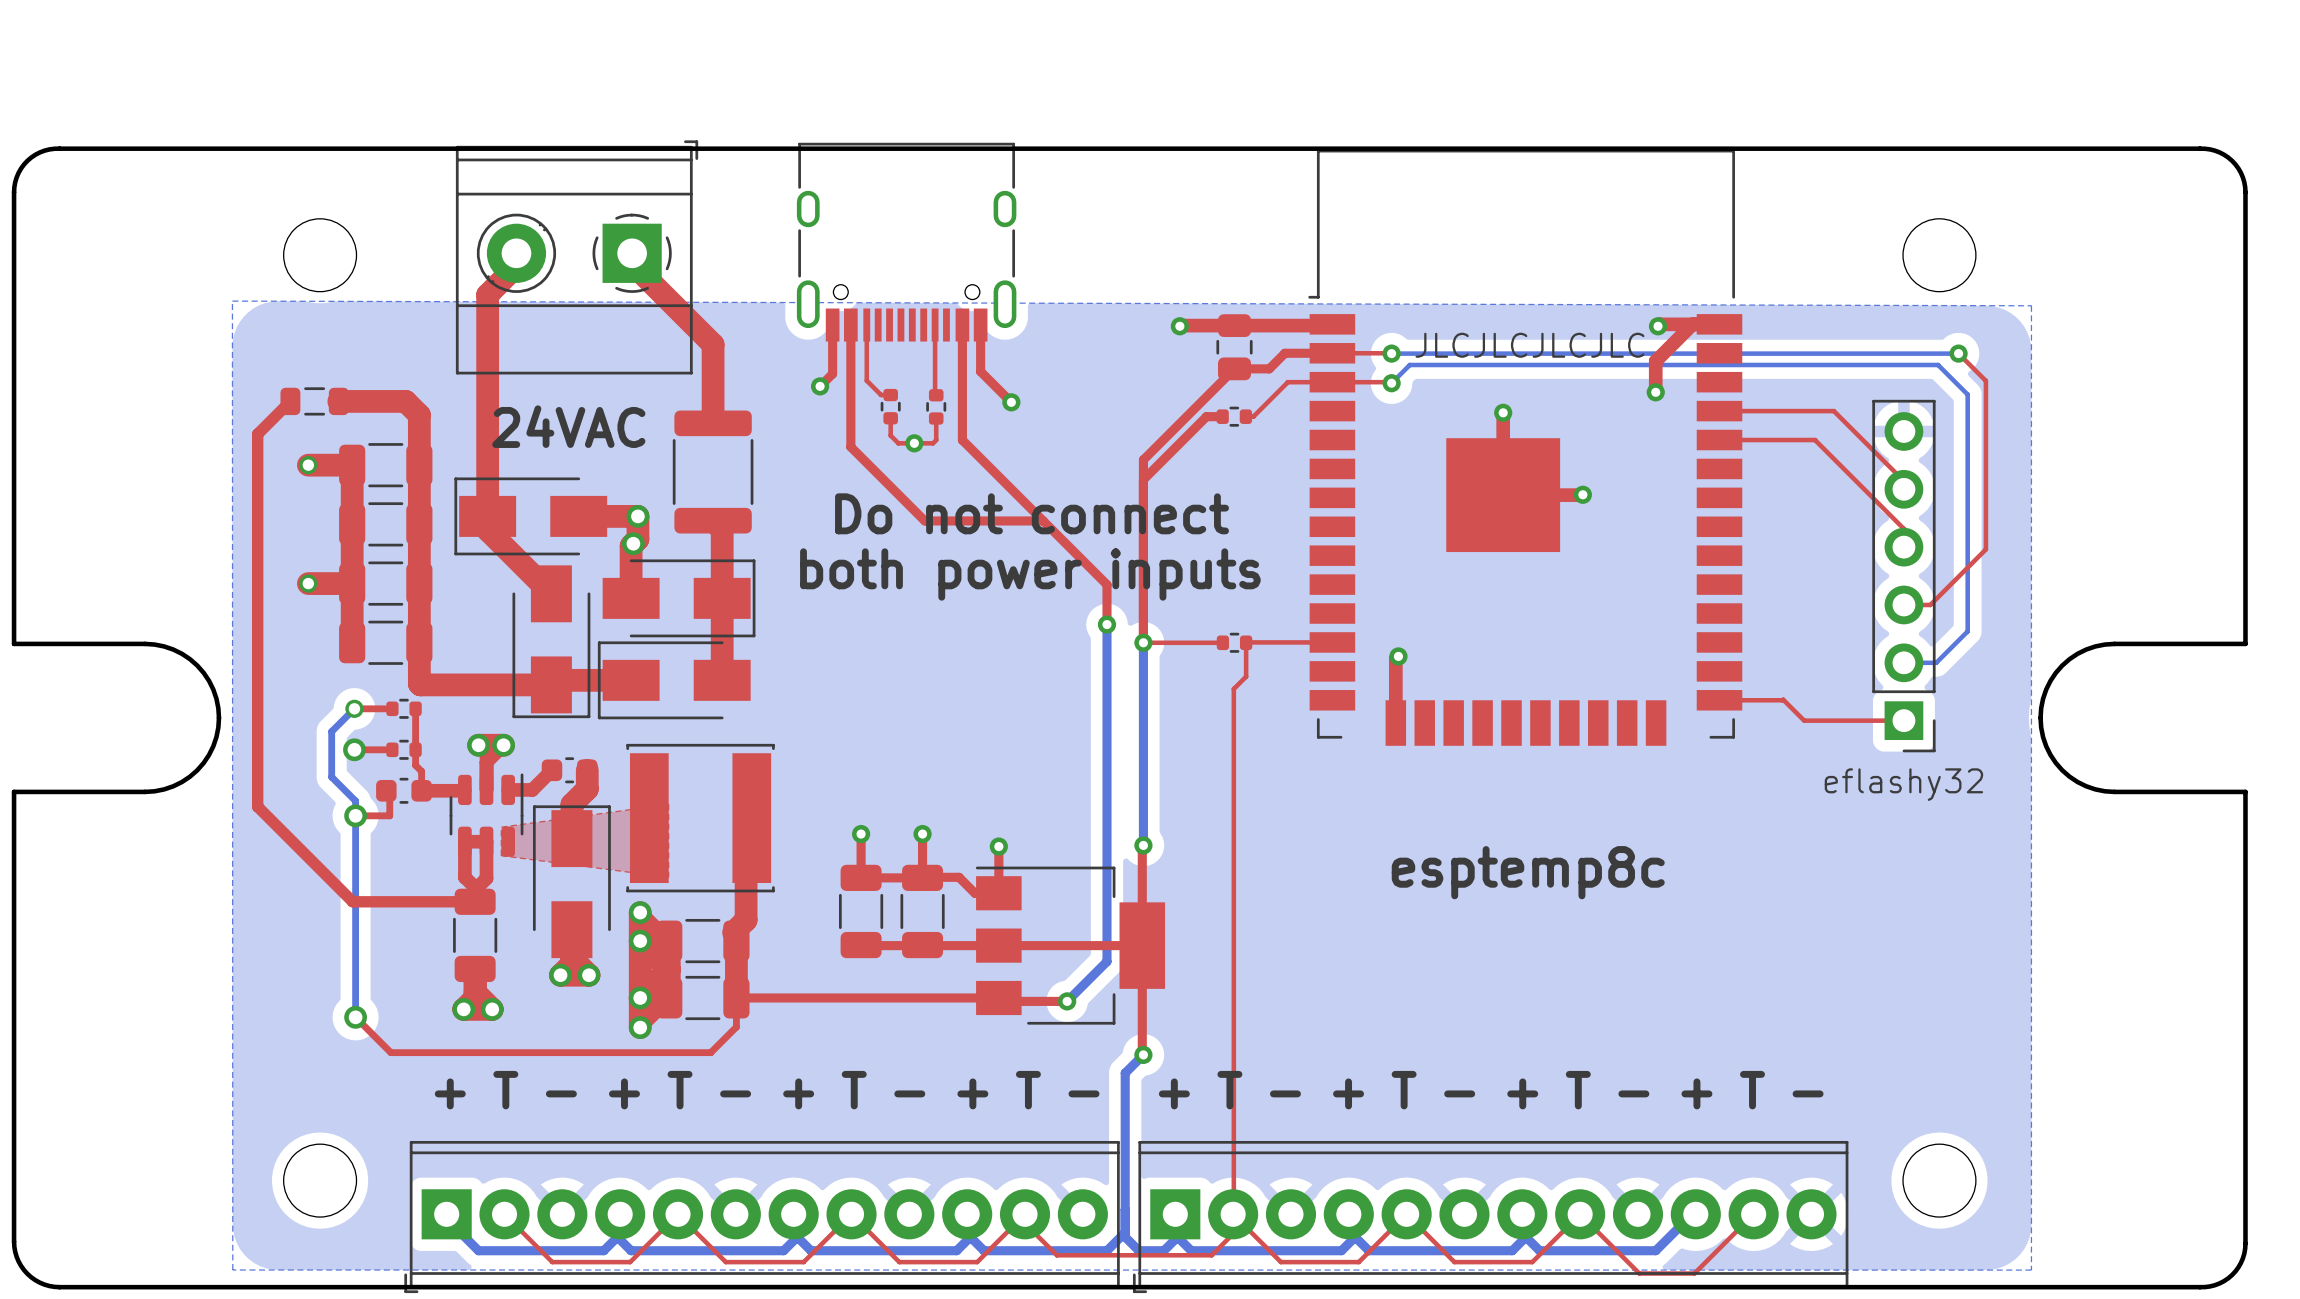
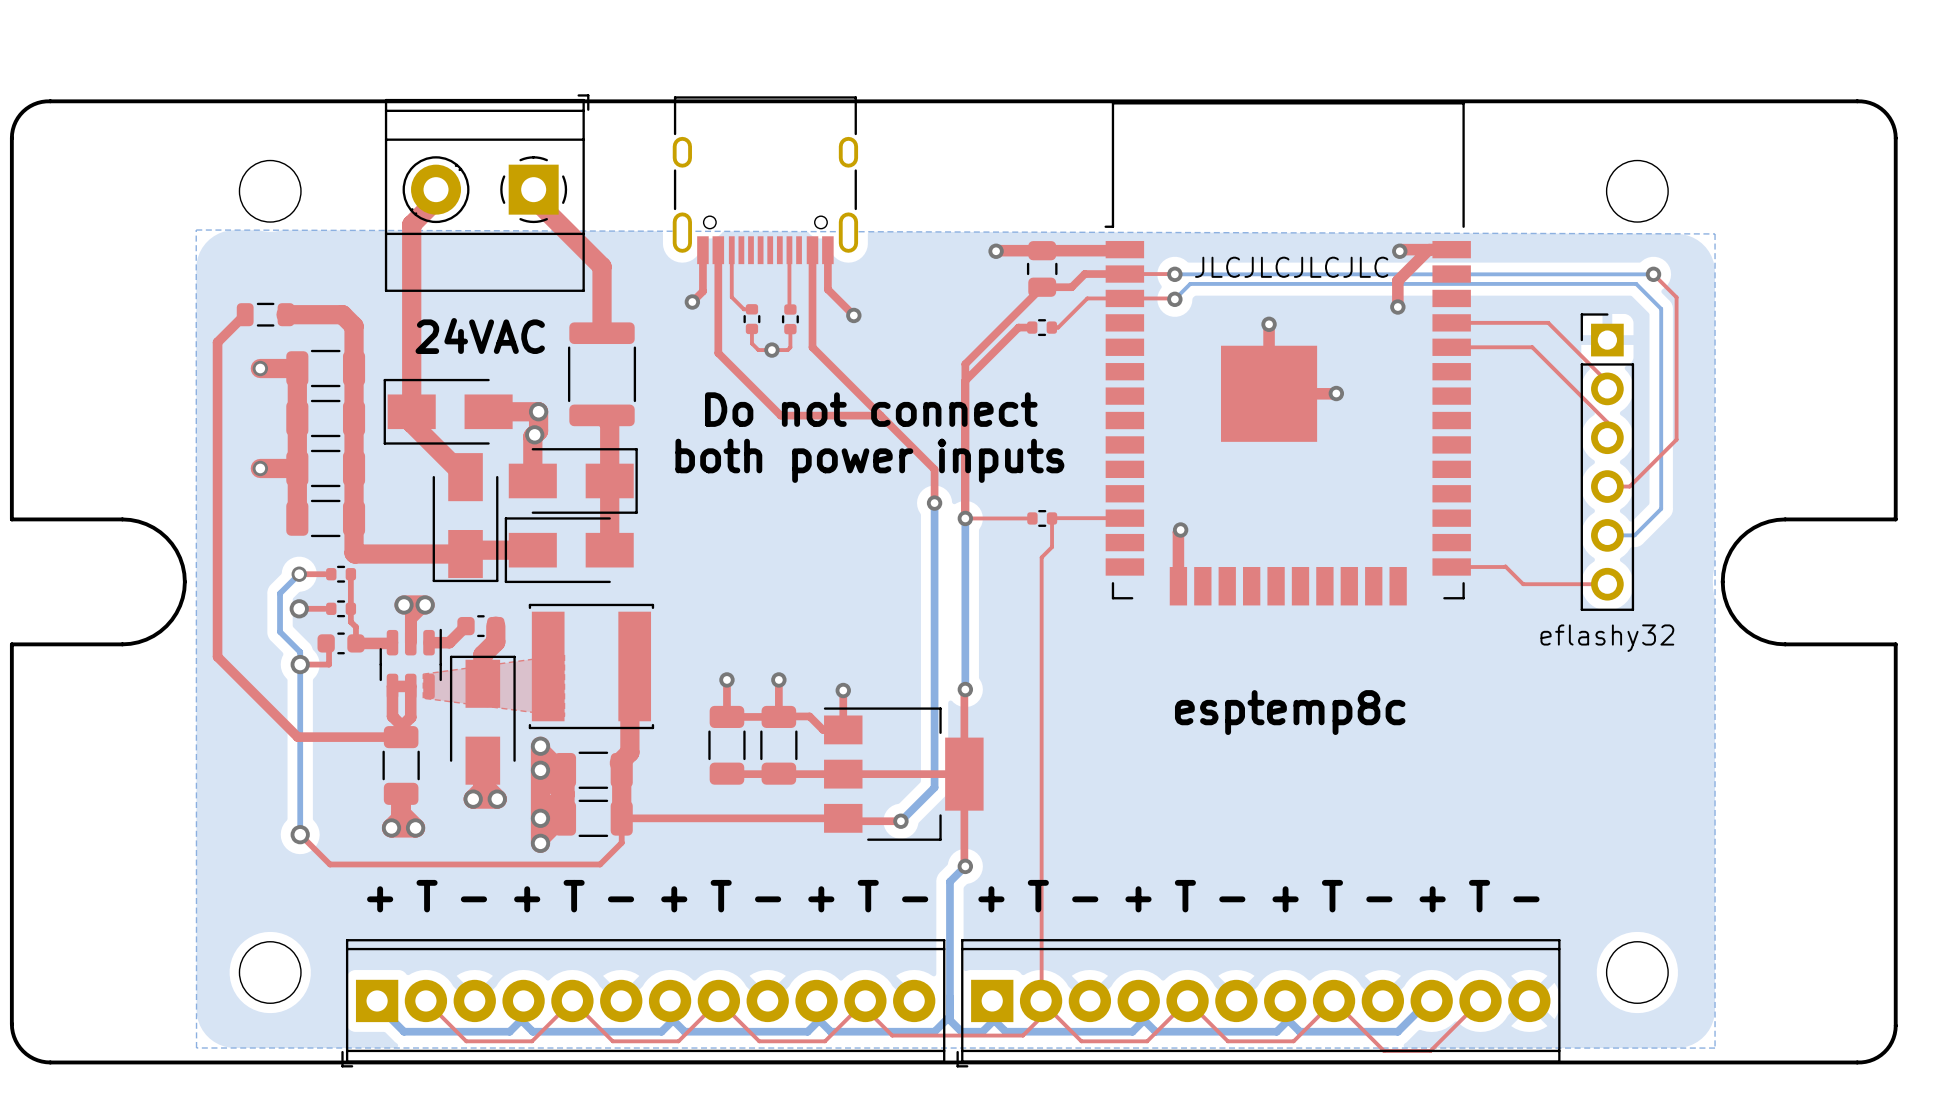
part rotation: 0° (1903, 576) -> 180° (1607, 462)

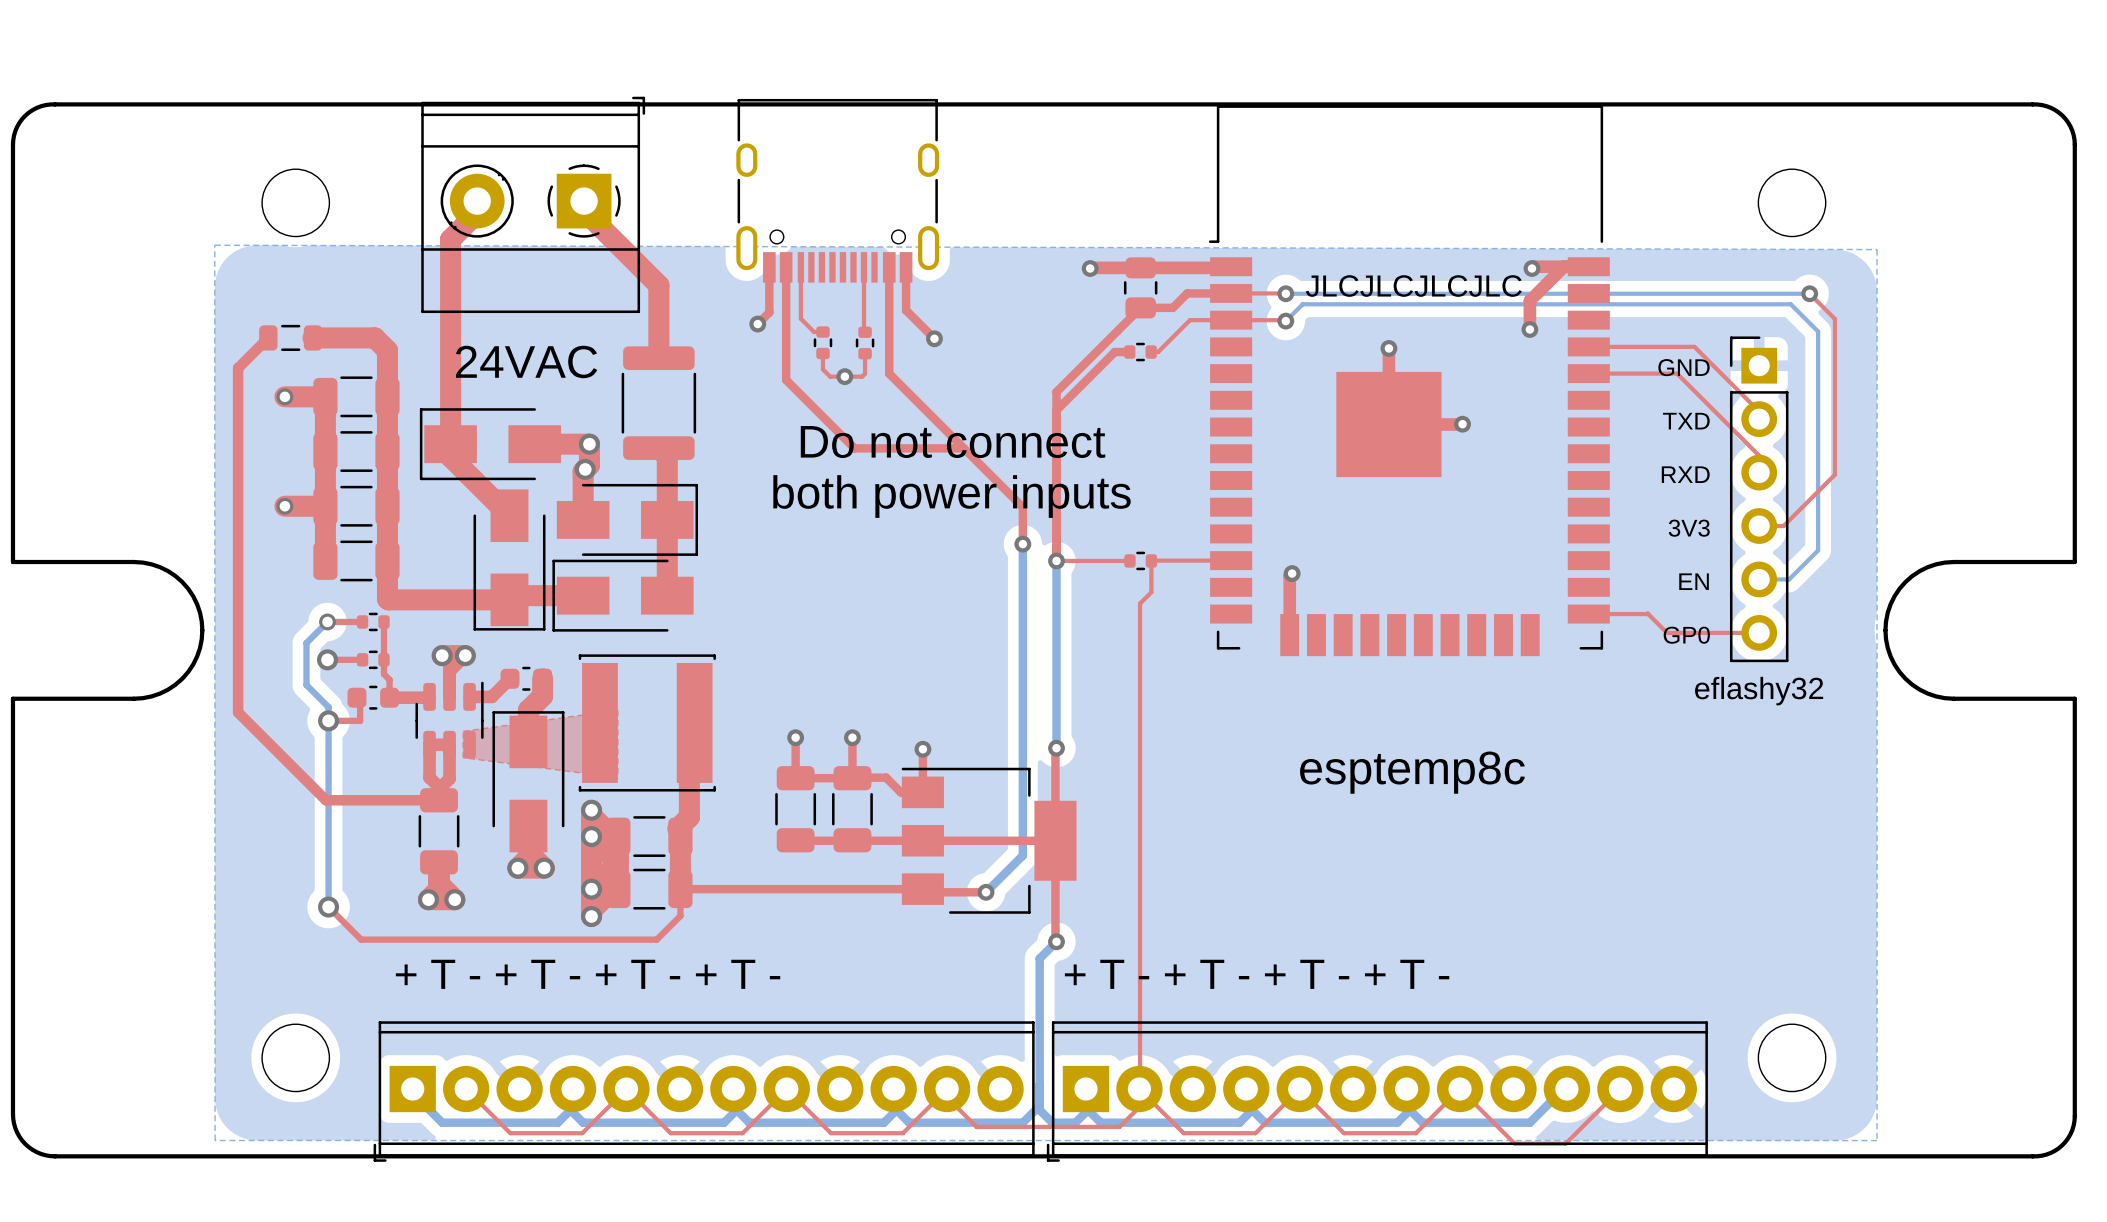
text: none -> GND (1684, 367)
text: none -> TXD (1686, 421)
text: none -> RXD (1685, 474)
text: none -> 3V3 (1689, 528)
text: none -> EN (1694, 581)
text: none -> GP0 (1686, 635)

